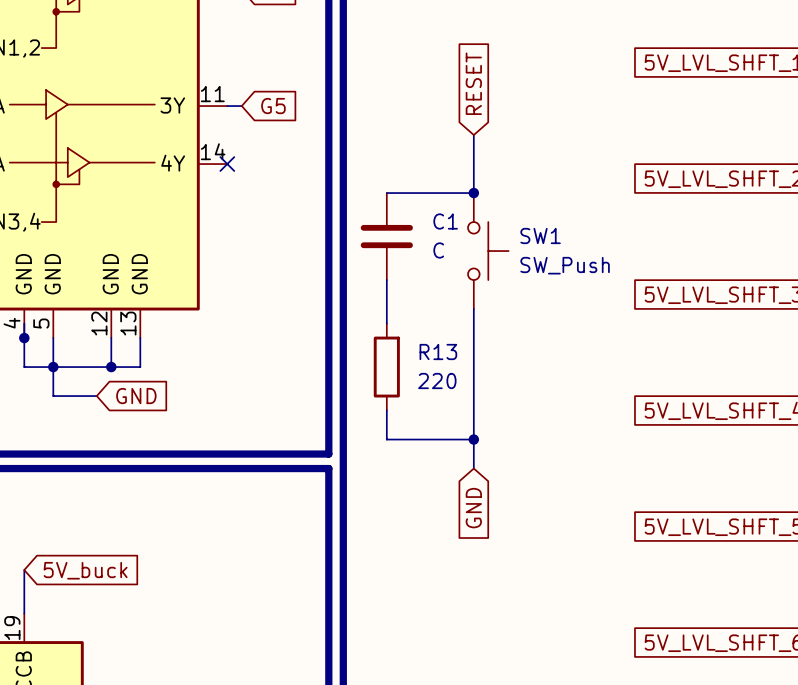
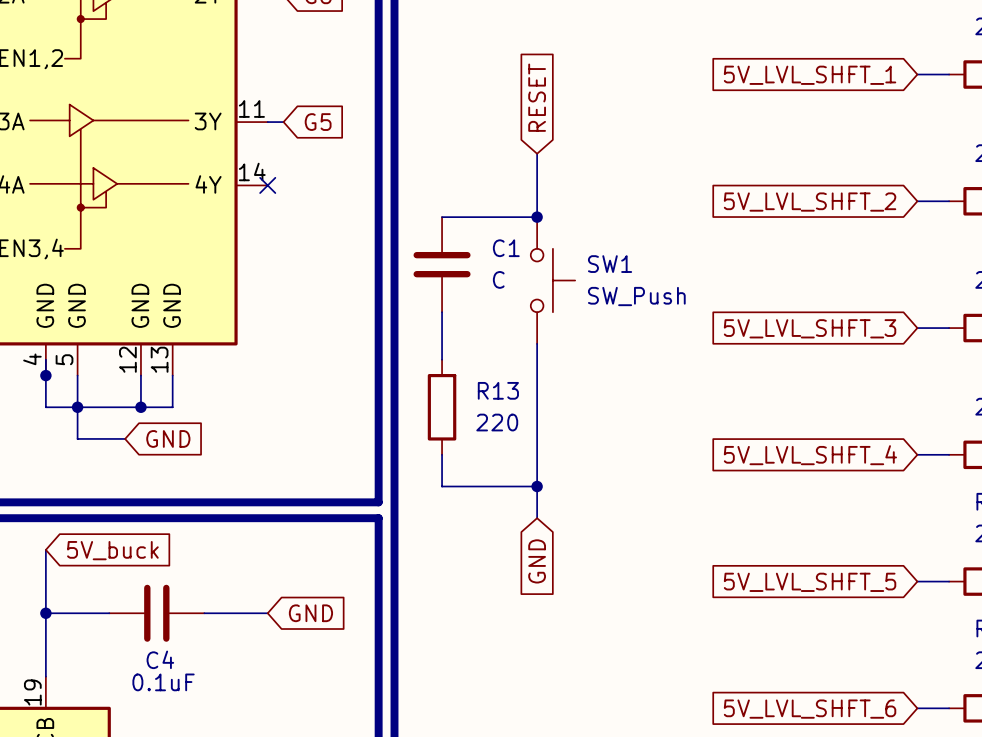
wire: none -> (45, 549) (45, 629)
junction: none -> (45, 613)
C4: none -> 0.1uF (156, 613)
wire: none -> (204, 613) (267, 613)
global label: none -> GND (310, 613)
global label position: 5V_buck (85, 570) -> 5V_buck (112, 550)

